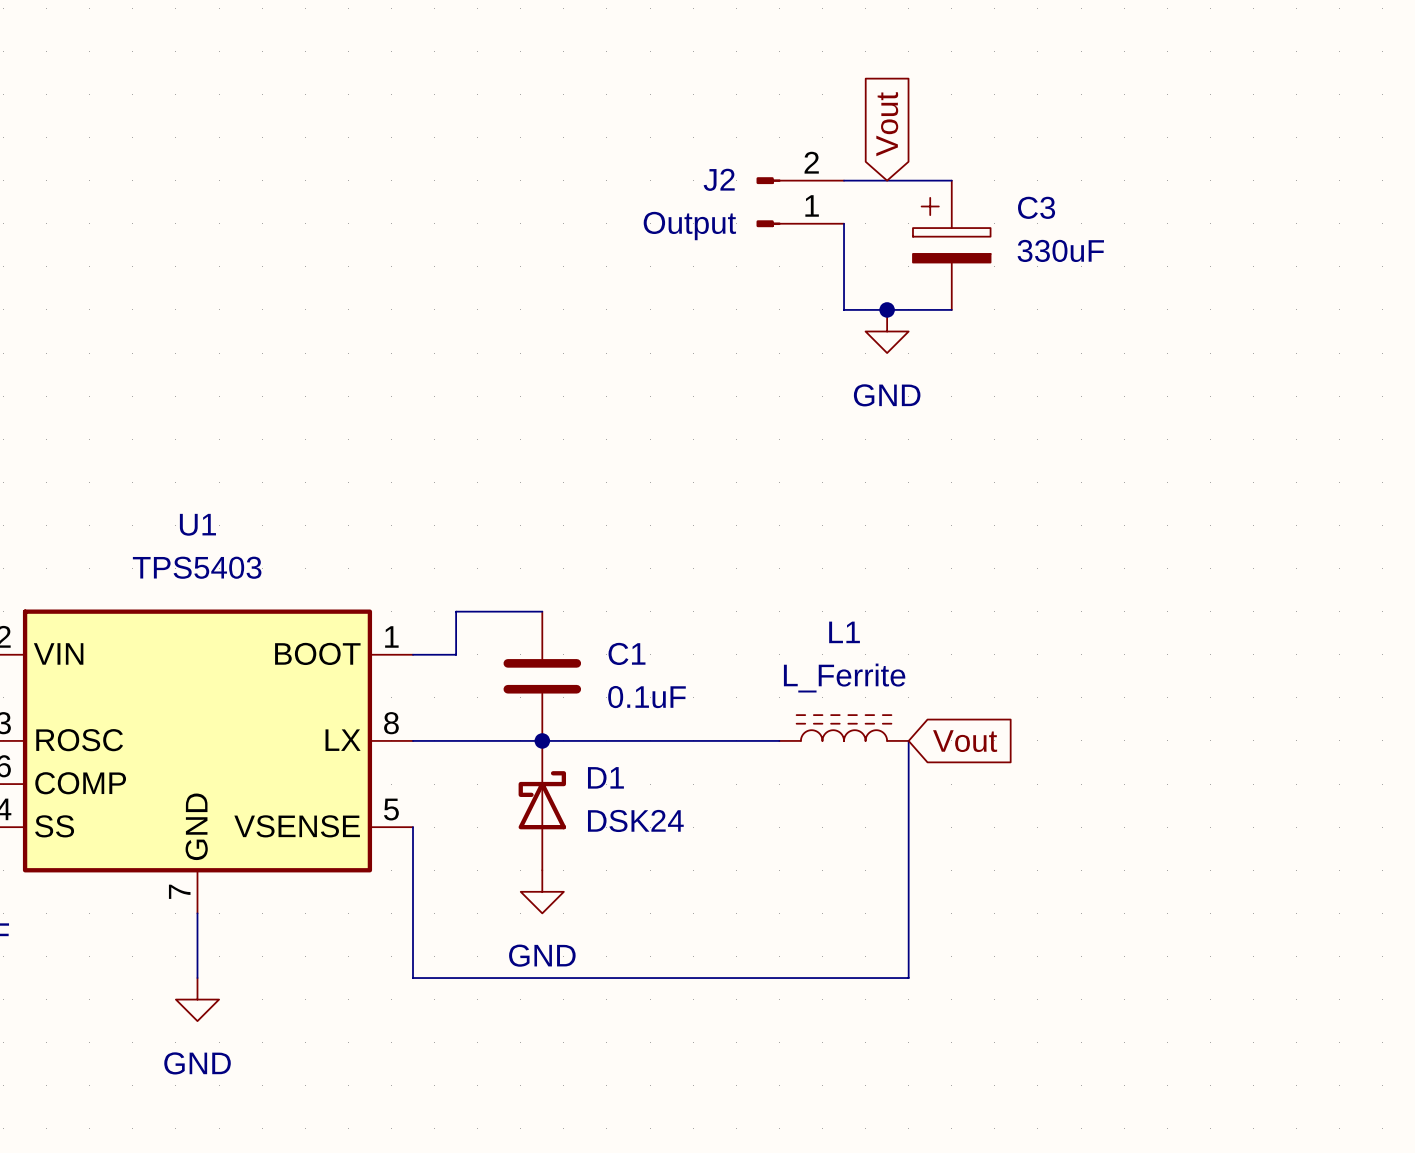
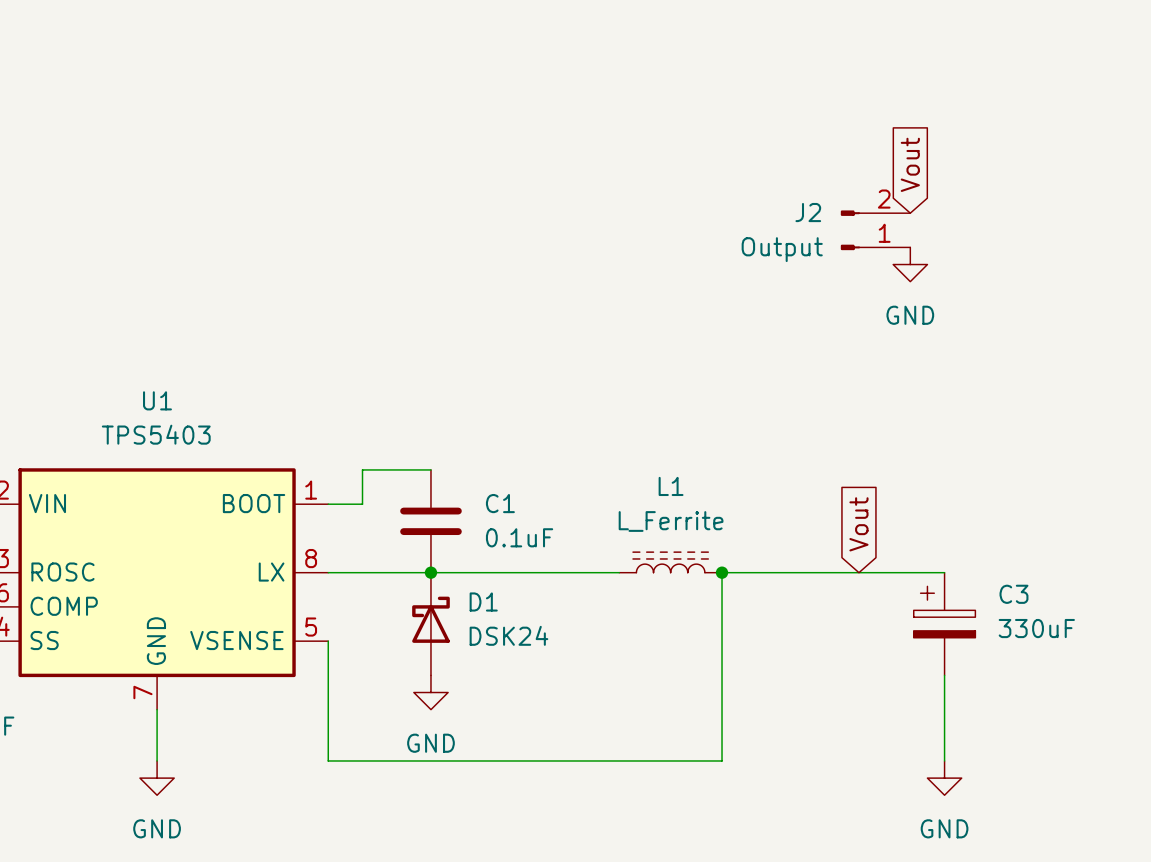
global label: Vout (887, 124) -> none
wire: (844, 180) (951, 180) -> none
J2 position: (800, 202) -> (875, 230)
wire: (844, 223) (844, 309) (951, 309) -> none
global label: none -> Vout (910, 164)
C3 position: (951, 245) -> (944, 624)
junction: (887, 309) -> none
power symbol position: GND (887, 331) -> GND (910, 264)
wire: none -> (722, 572) (944, 572)
junction: none -> (722, 572)
global label rotation: 0° (965, 741) -> 90° counterclockwise (858, 524)
wire: none -> (944, 675) (944, 760)
power symbol: none -> GND (944, 778)

